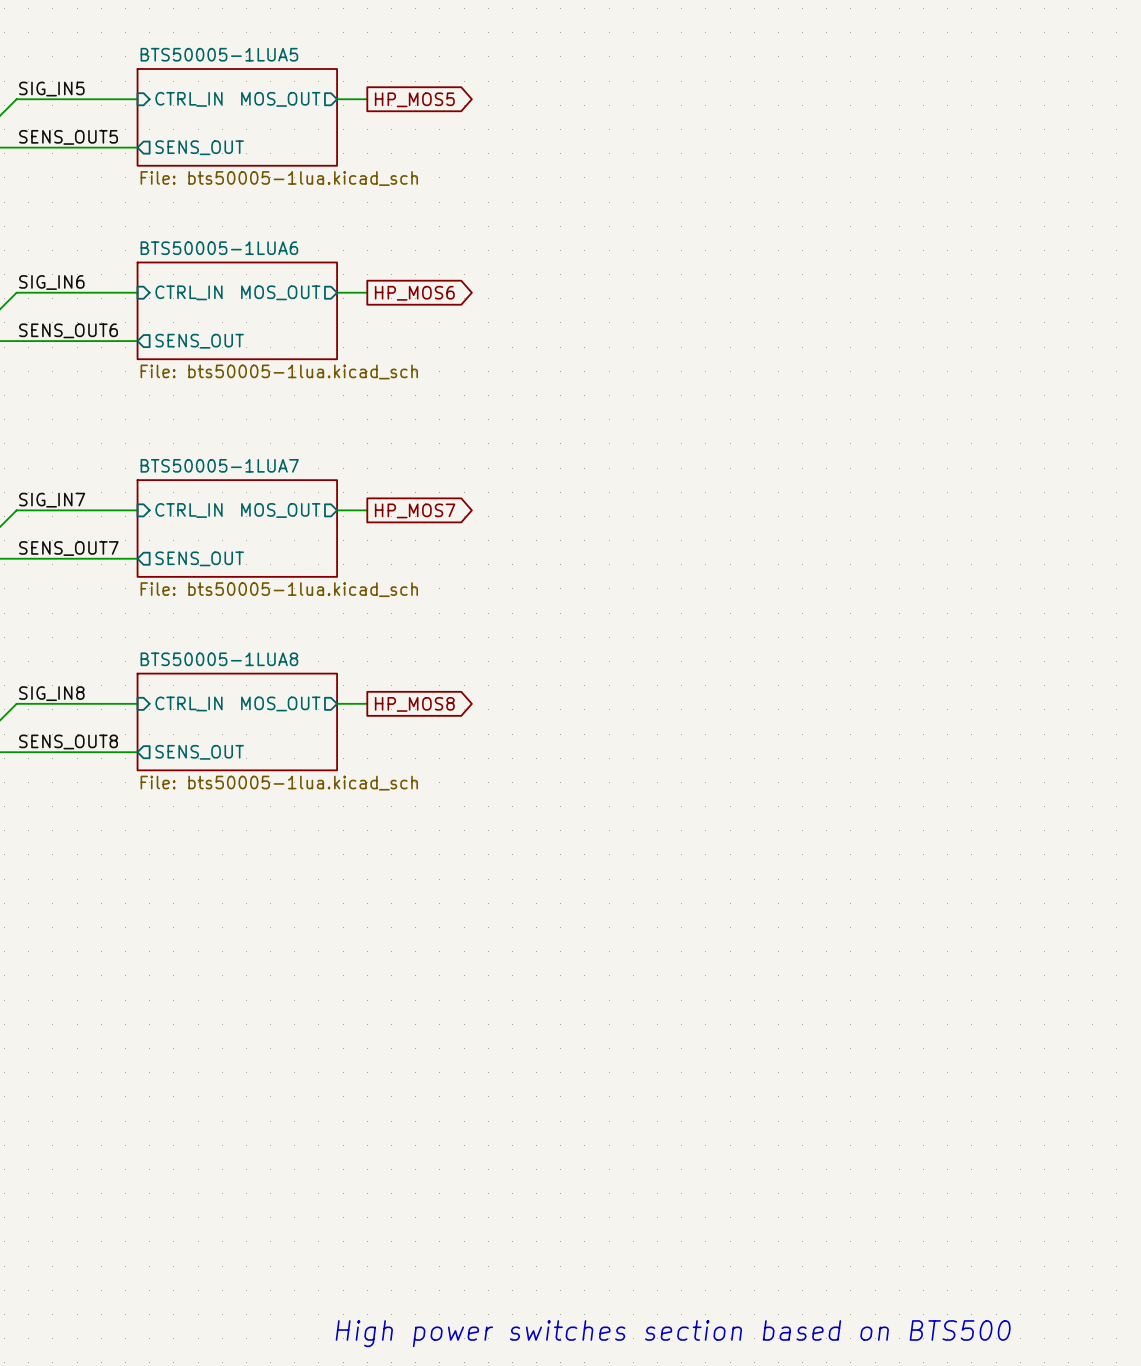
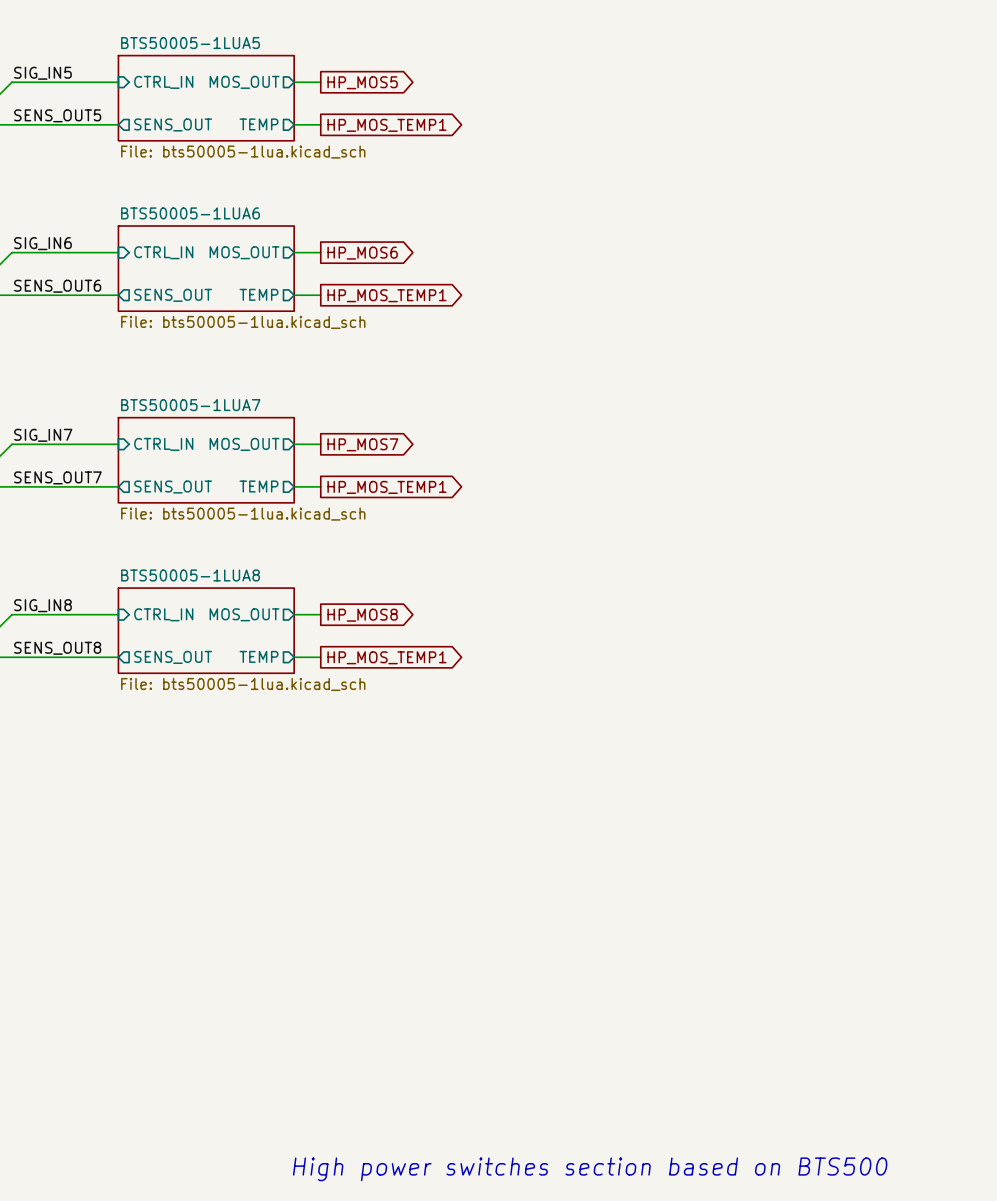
sheet pin: none -> TEMP (258, 124)
wire: none -> (294, 124) (320, 124)
global label: none -> HP_MOS_TEMP1 (386, 125)
sheet pin: none -> TEMP (258, 294)
wire: none -> (294, 295) (320, 295)
global label: none -> HP_MOS_TEMP1 (386, 295)
sheet pin: none -> TEMP (258, 486)
wire: none -> (294, 486) (320, 486)
global label: none -> HP_MOS_TEMP1 (386, 487)
sheet pin: none -> TEMP (258, 656)
wire: none -> (294, 657) (320, 657)
global label: none -> HP_MOS_TEMP1 (386, 657)

